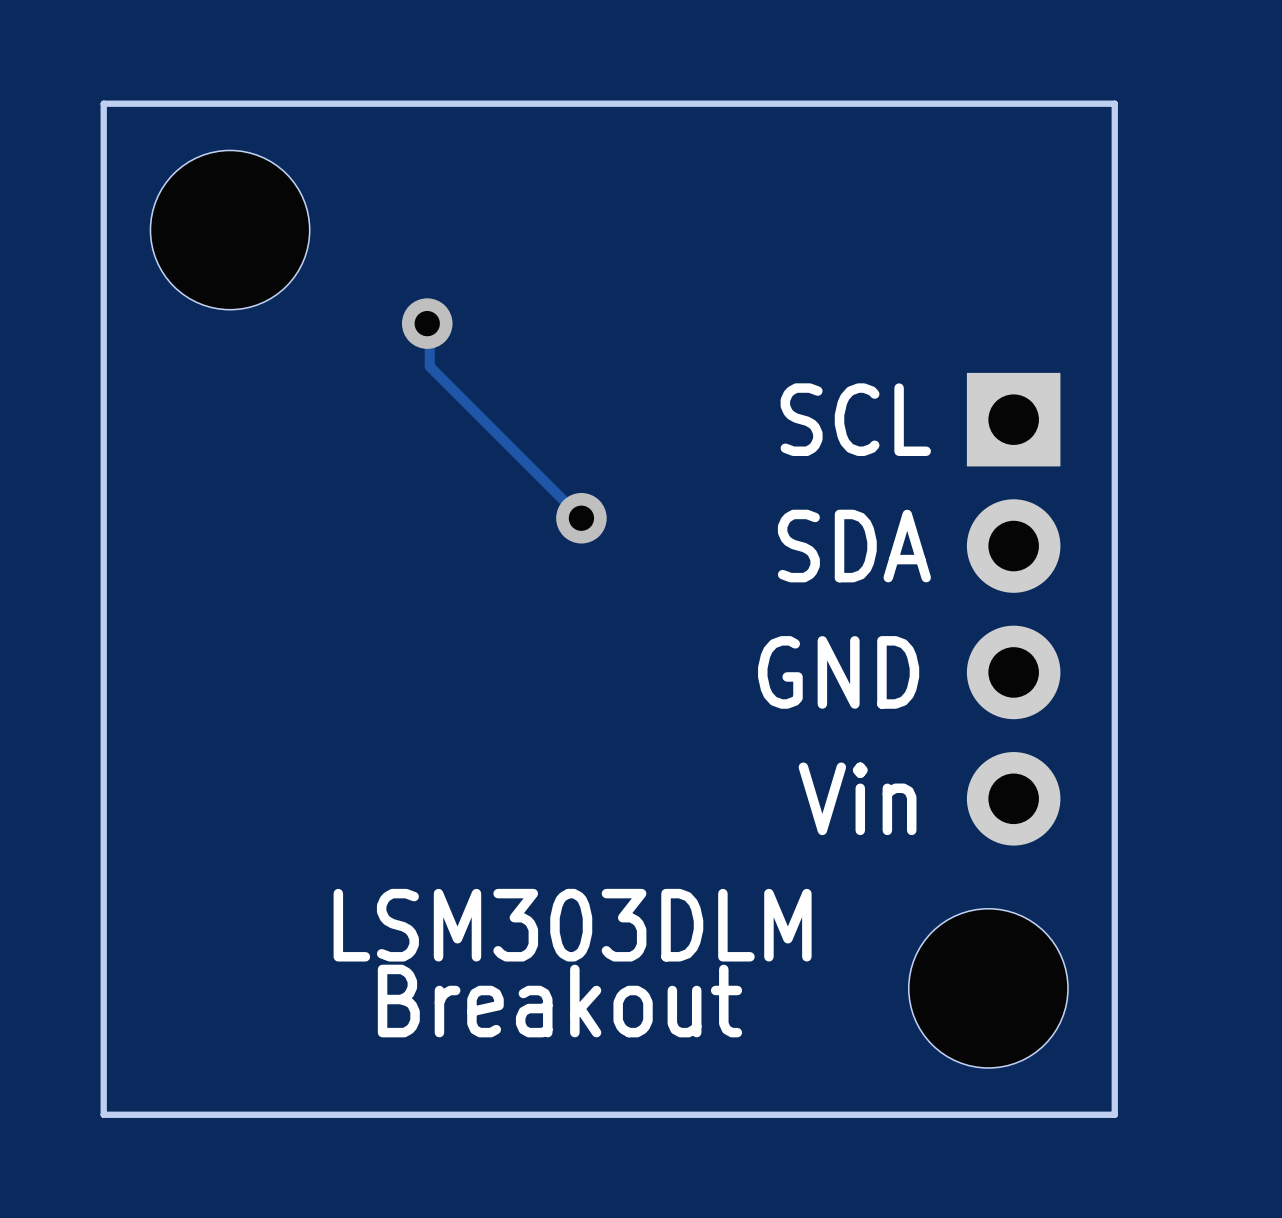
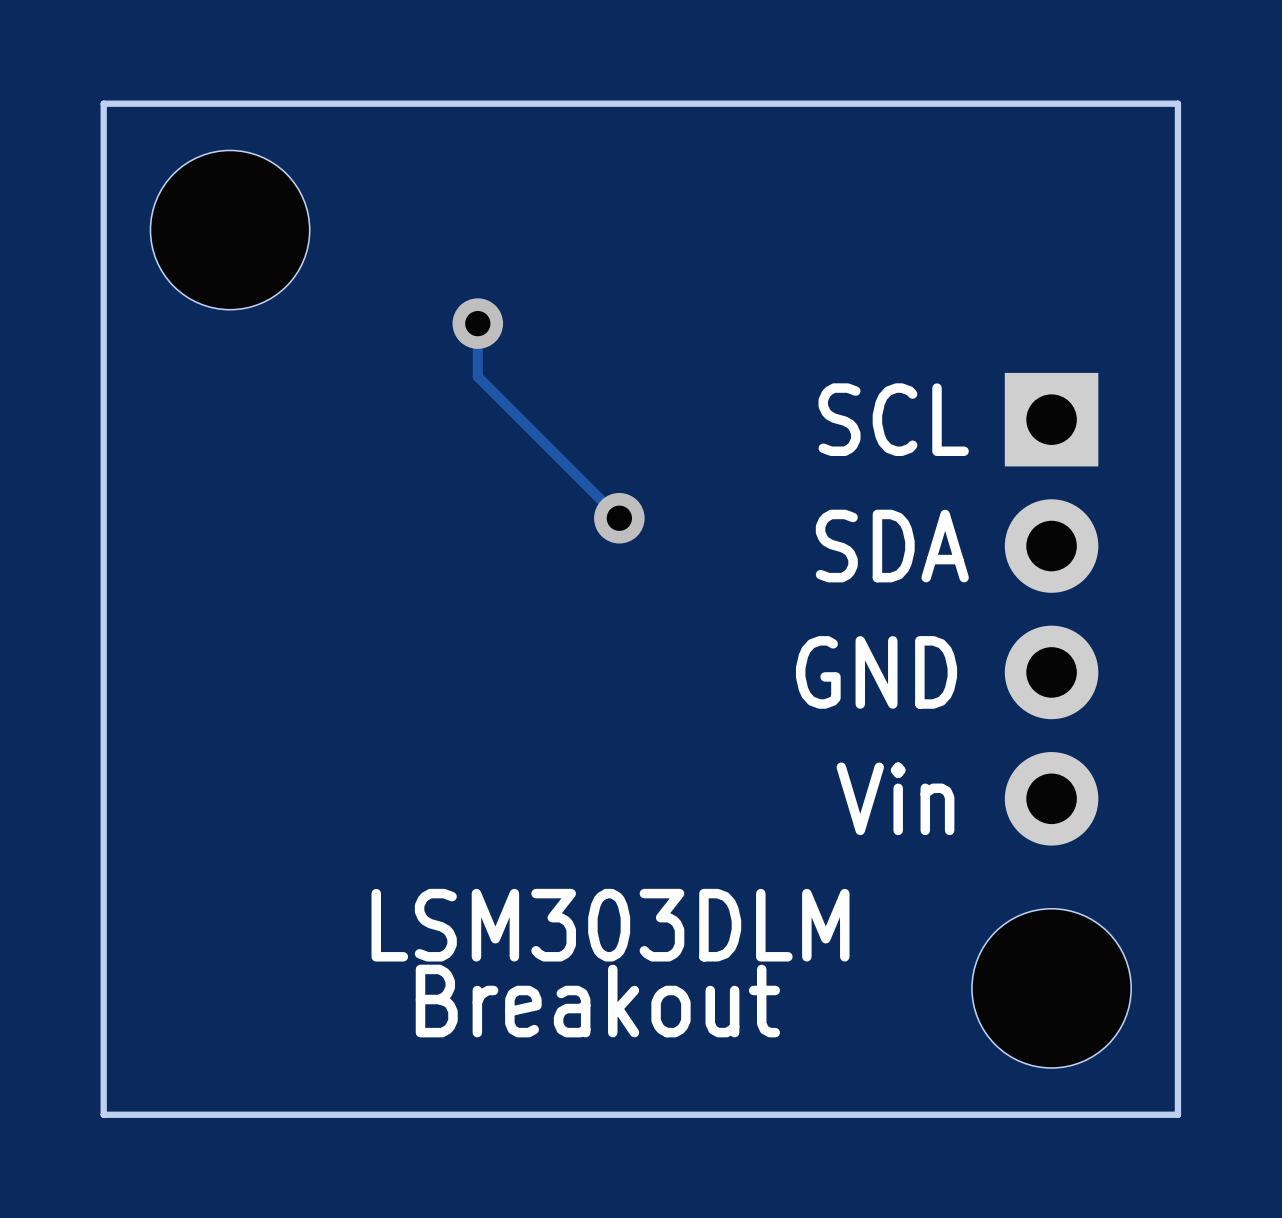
board edge: (1114, 103) (1114, 1114) -> (1114, 103) (1177, 103) (1177, 1114) (1114, 1114)
track: (427, 323) (429, 326) (429, 366) (581, 518) -> none
via position: (427, 323) -> (477, 323)
track: none -> (477, 323) (477, 376) (619, 518)
text position: SCL (855, 419) -> SCL (893, 419)
via position: (581, 518) -> (619, 518)
text position: SDA (854, 546) -> SDA (892, 546)
part position: (1013, 609) -> (1051, 609)
text position: GND (838, 672) -> GND (876, 672)
text position: Vin (857, 798) -> Vin (895, 798)
text position: LSM303DLM (572, 925) -> LSM303DLM (610, 925)
hole position: (988, 988) -> (1051, 988)
text position: Breakout (559, 1001) -> Breakout (597, 1001)

